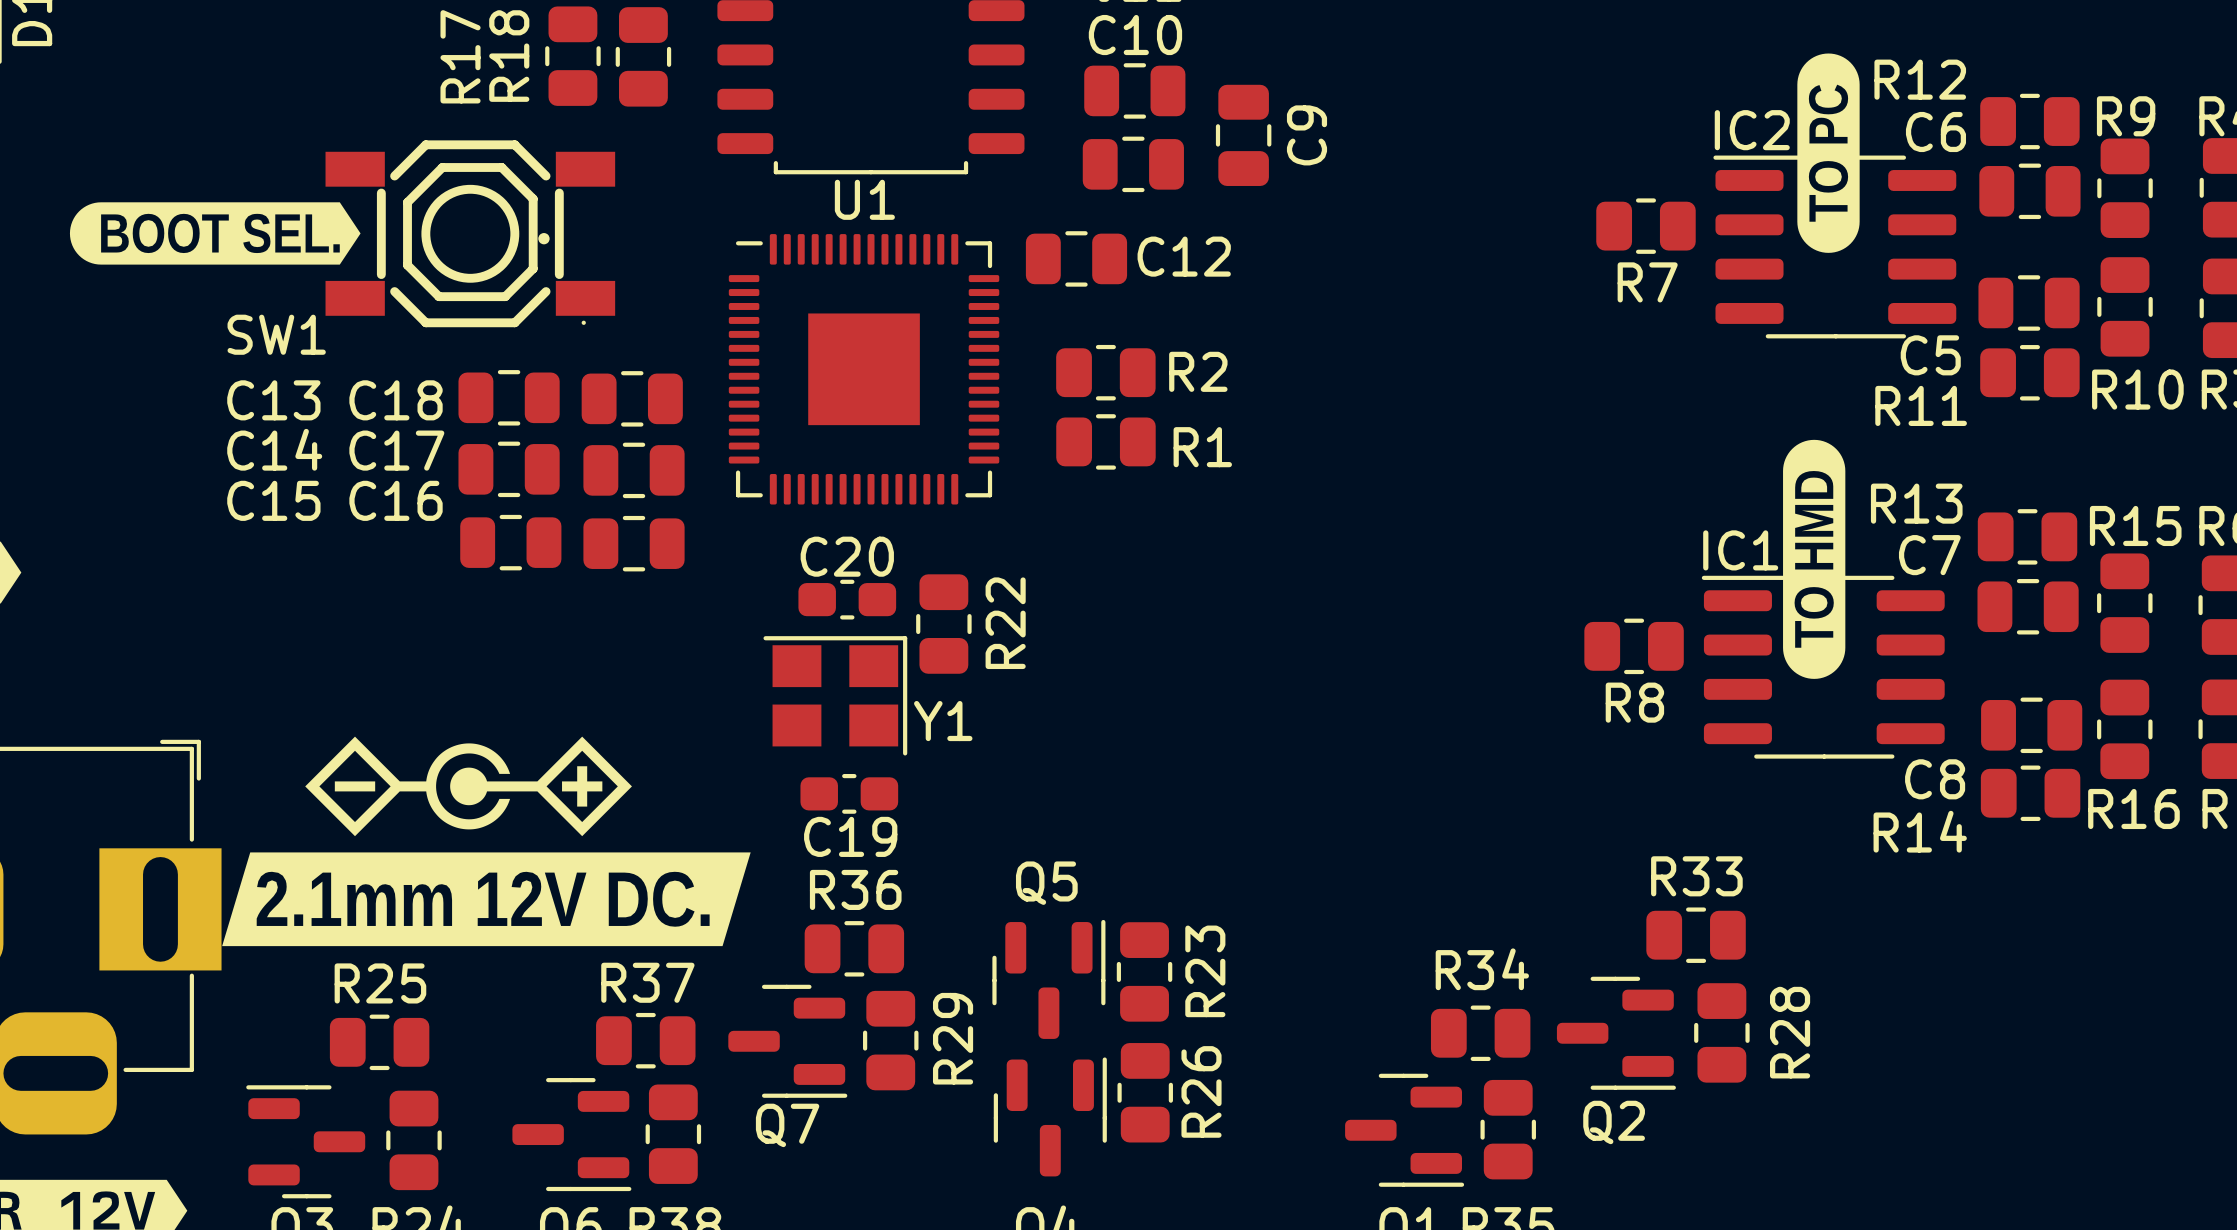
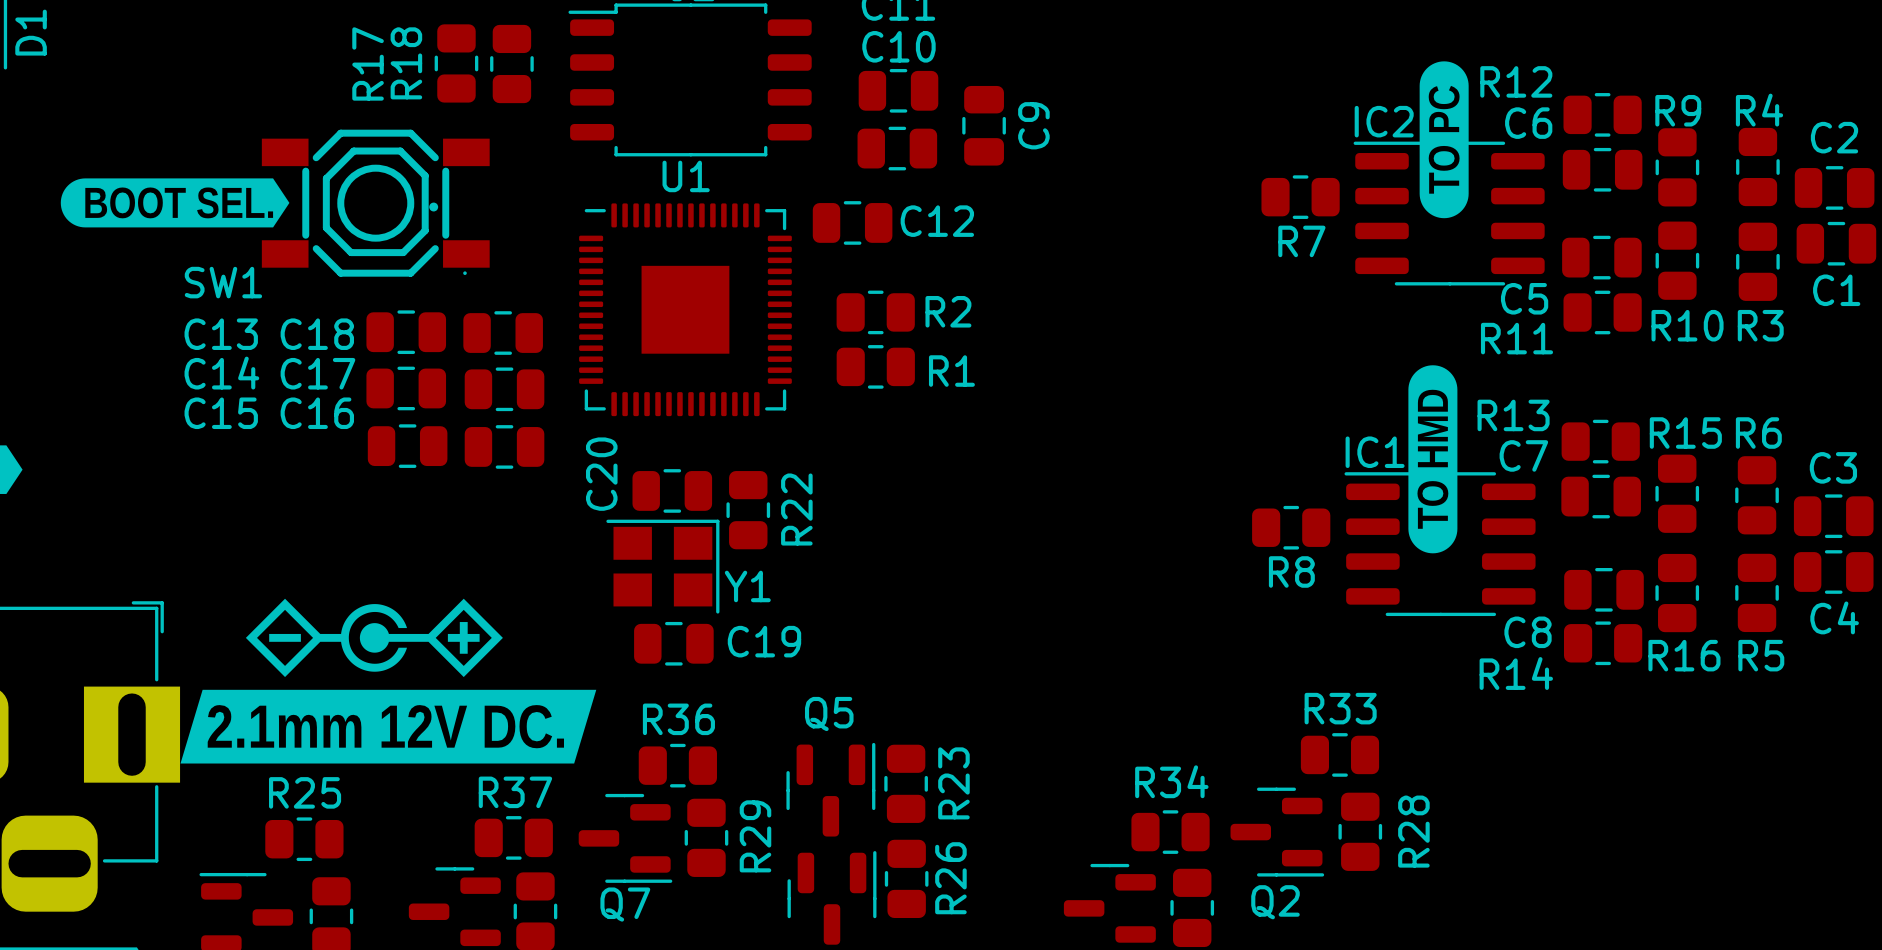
C20 name rotation: 0° (847, 556) -> 90° counterclockwise (601, 474)
C20 footprint: [798, 579, 897, 620] -> [632, 469, 713, 513]
C19 footprint: [800, 773, 899, 814] -> [634, 621, 714, 666]
C19 name position: C19 (850, 836) -> C19 (764, 641)

